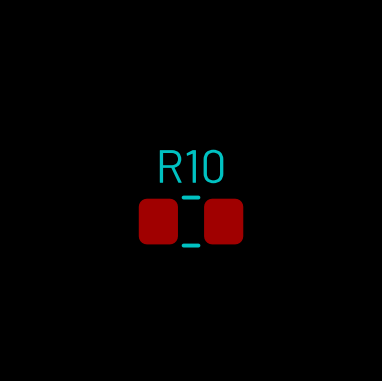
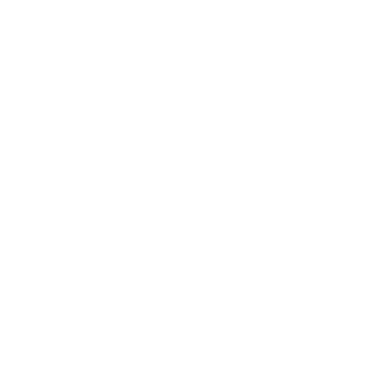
R10: (191, 221) -> none

